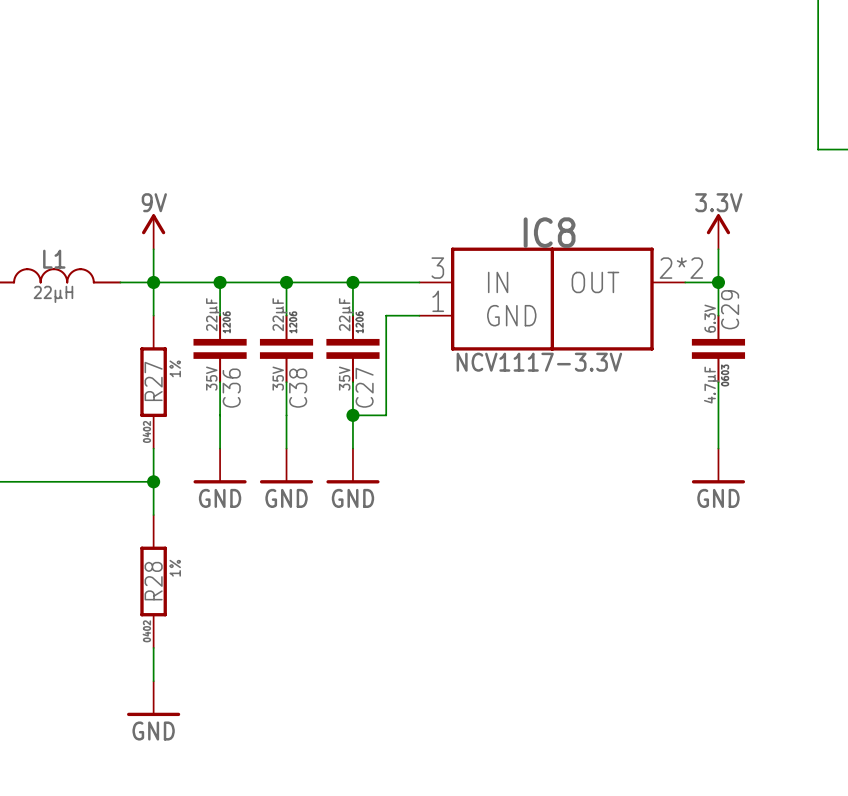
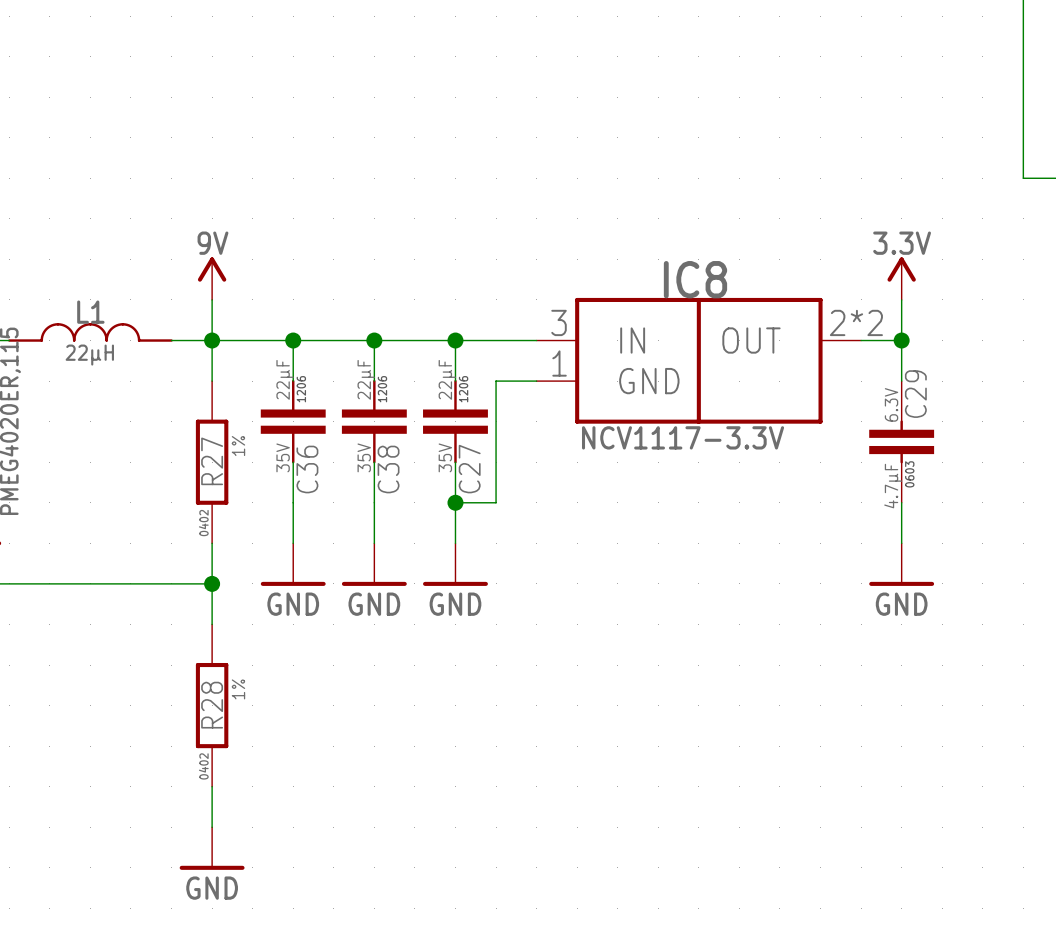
C29 symbol: [691, 314, 746, 384] -> [869, 381, 935, 503]

